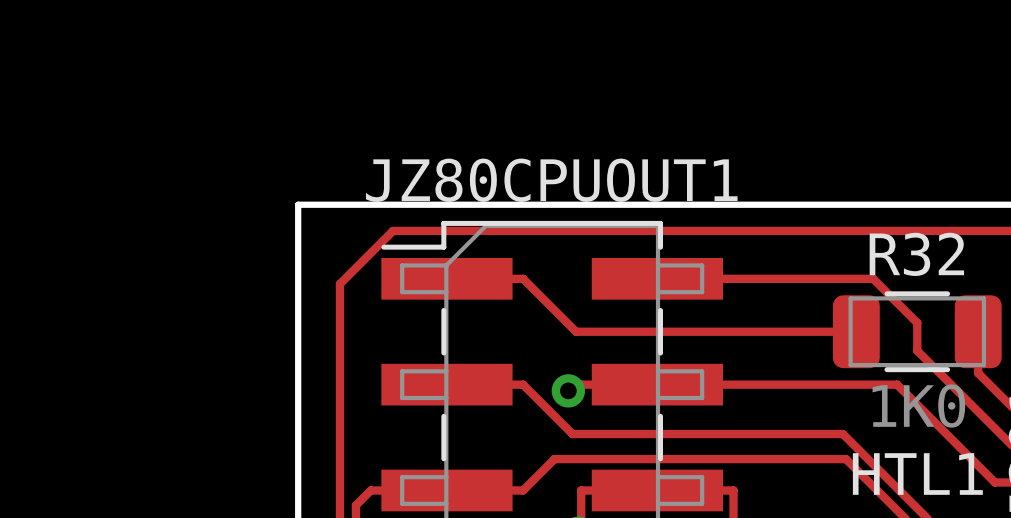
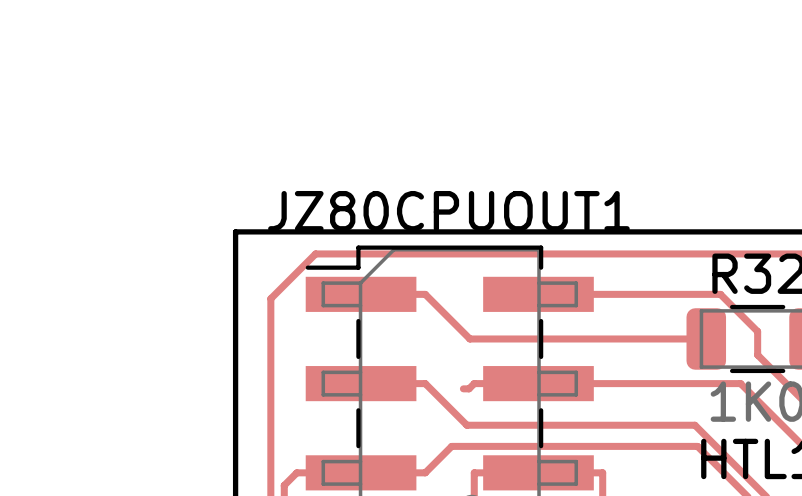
via: (568, 390) -> none

